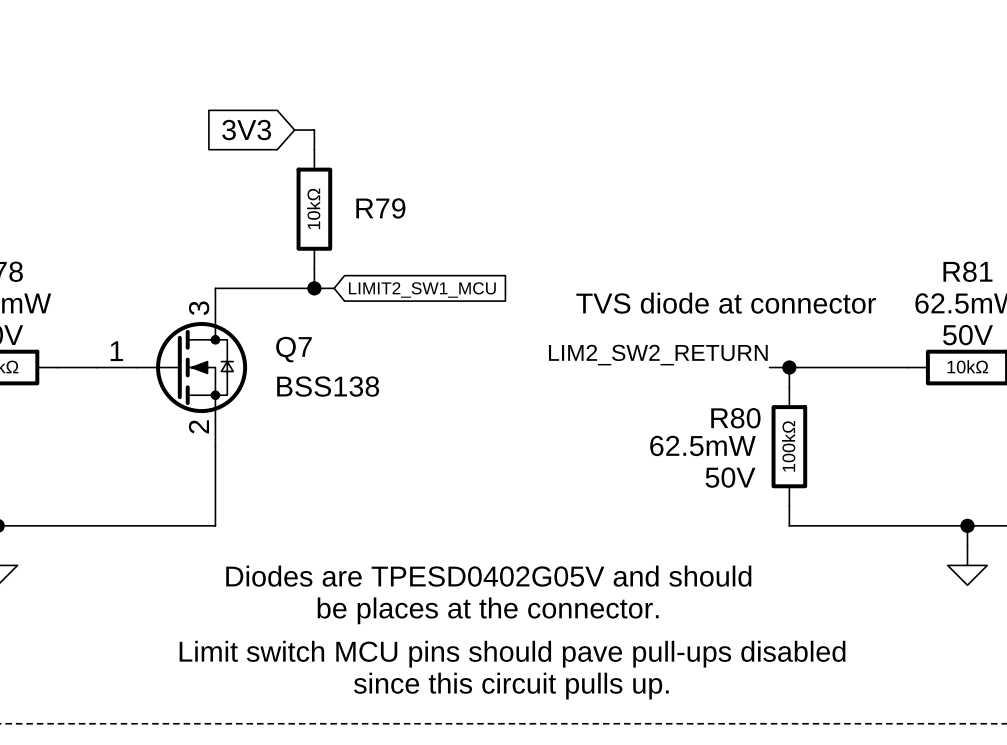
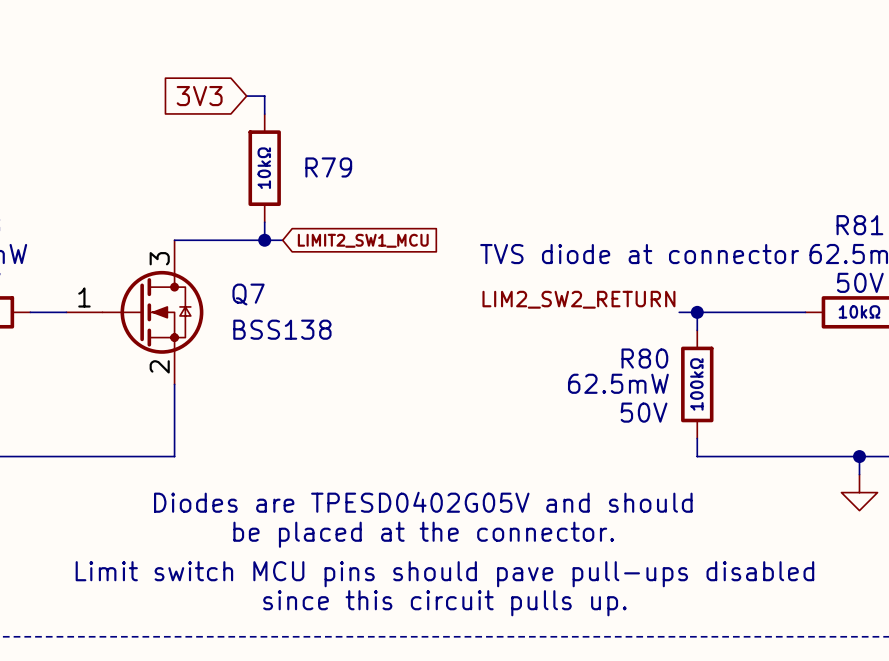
text: be places at the connector. (488, 610) -> be placed at the connector. (423, 534)

